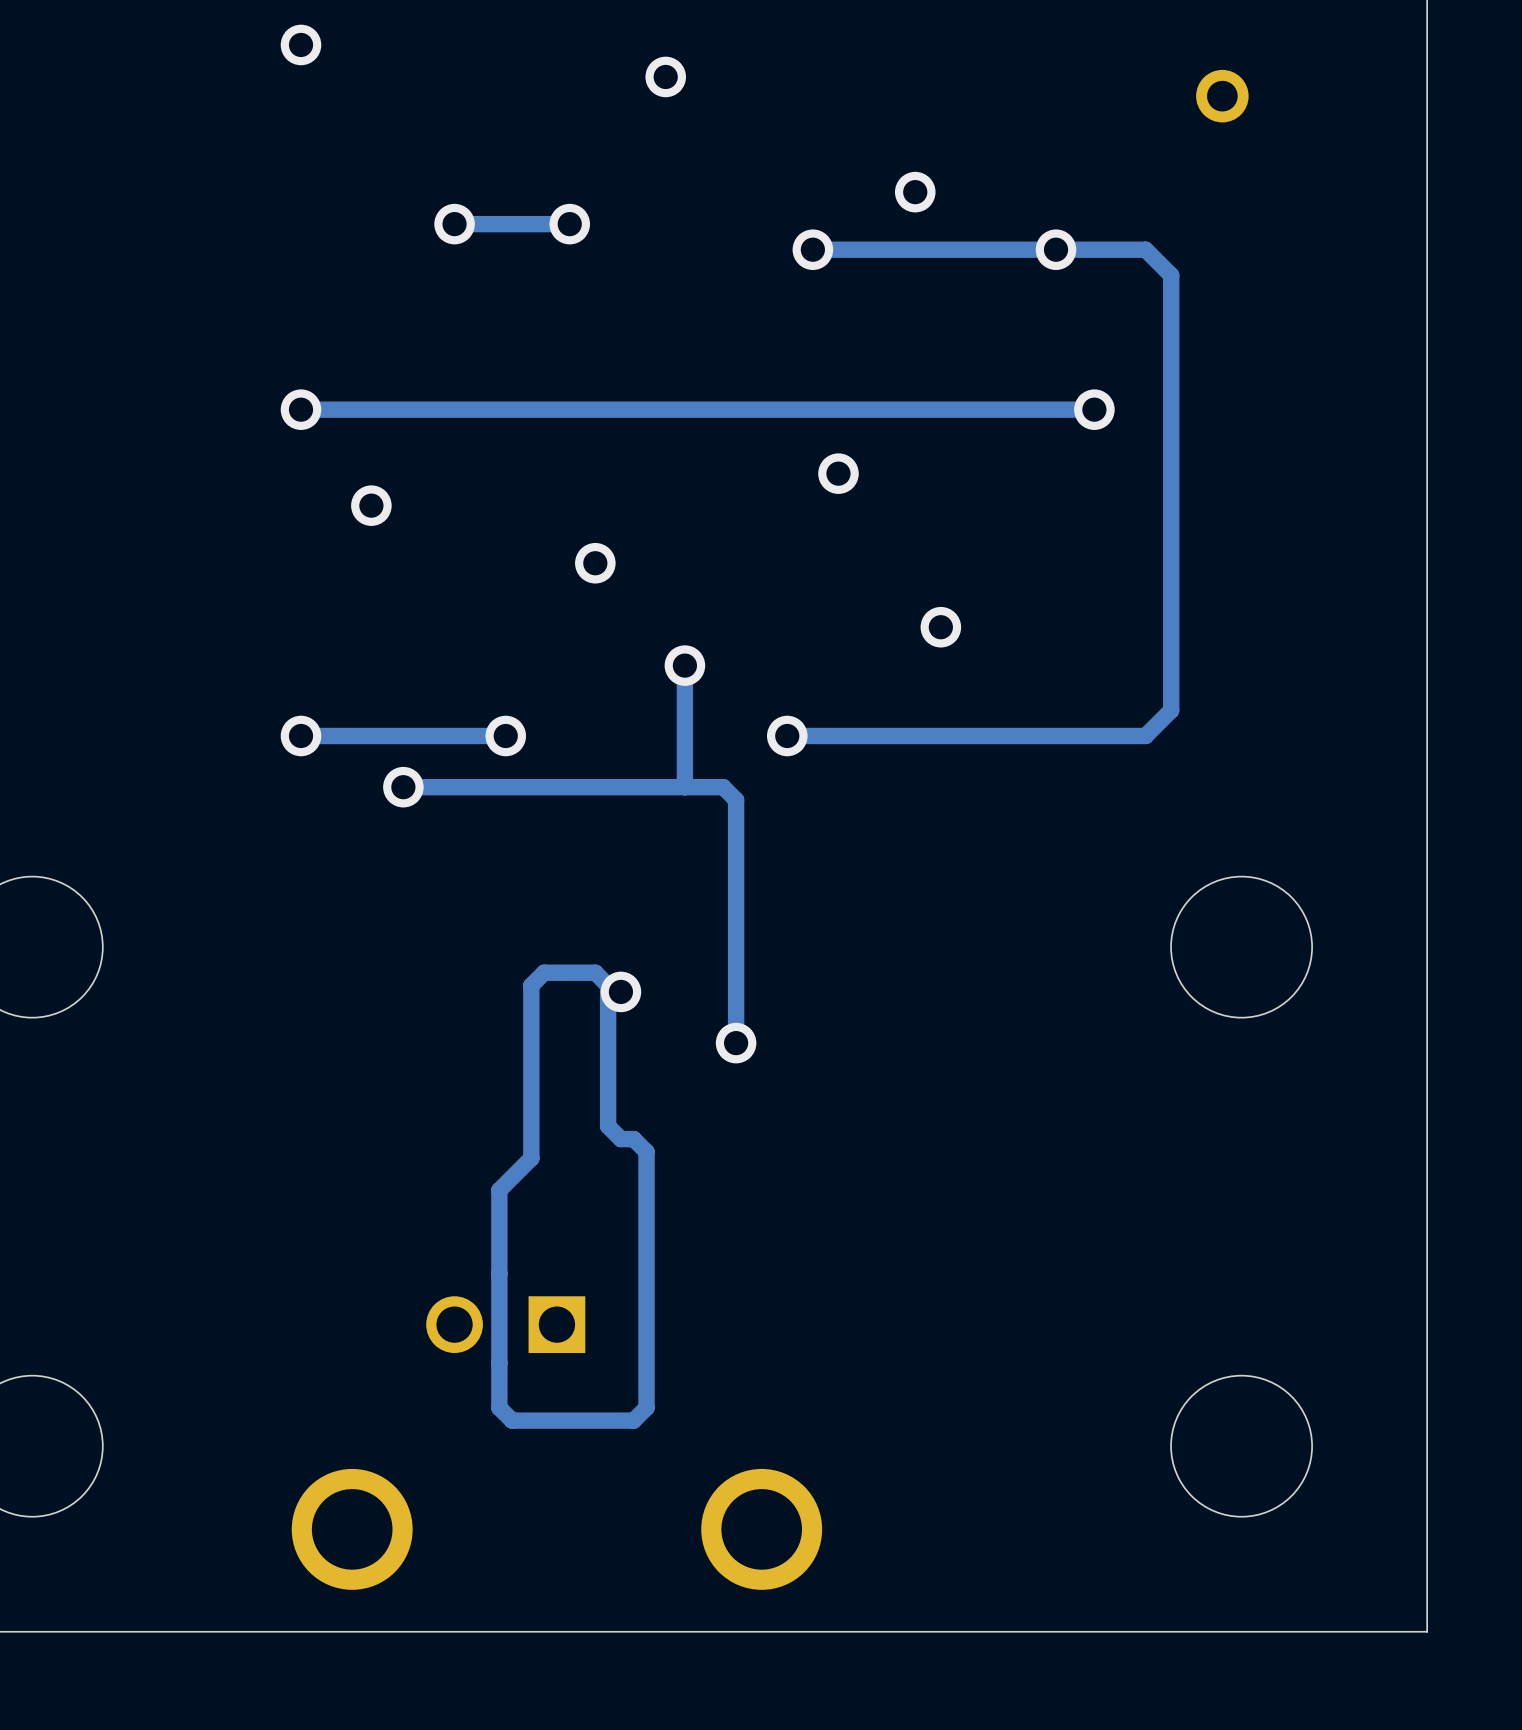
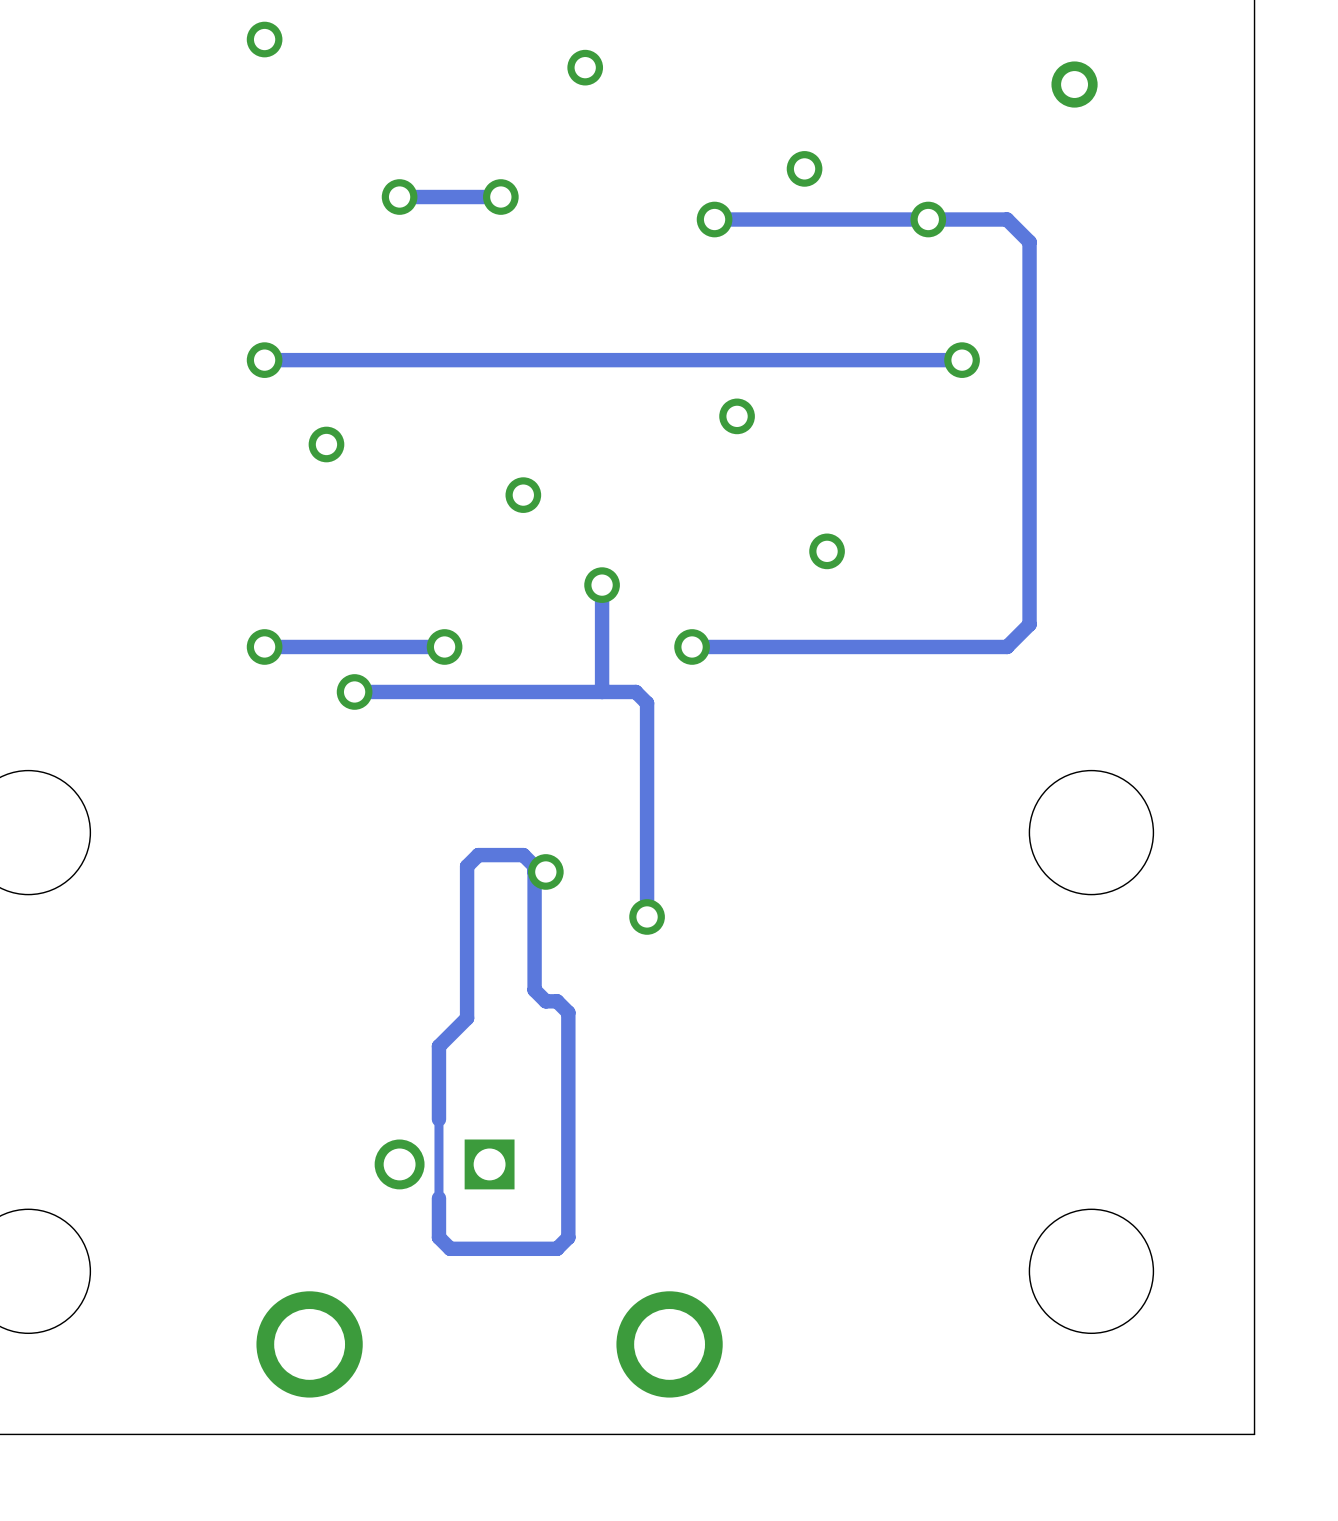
track width: thick (499, 1273) (499, 1363) -> thin (438, 1119) (438, 1198)

